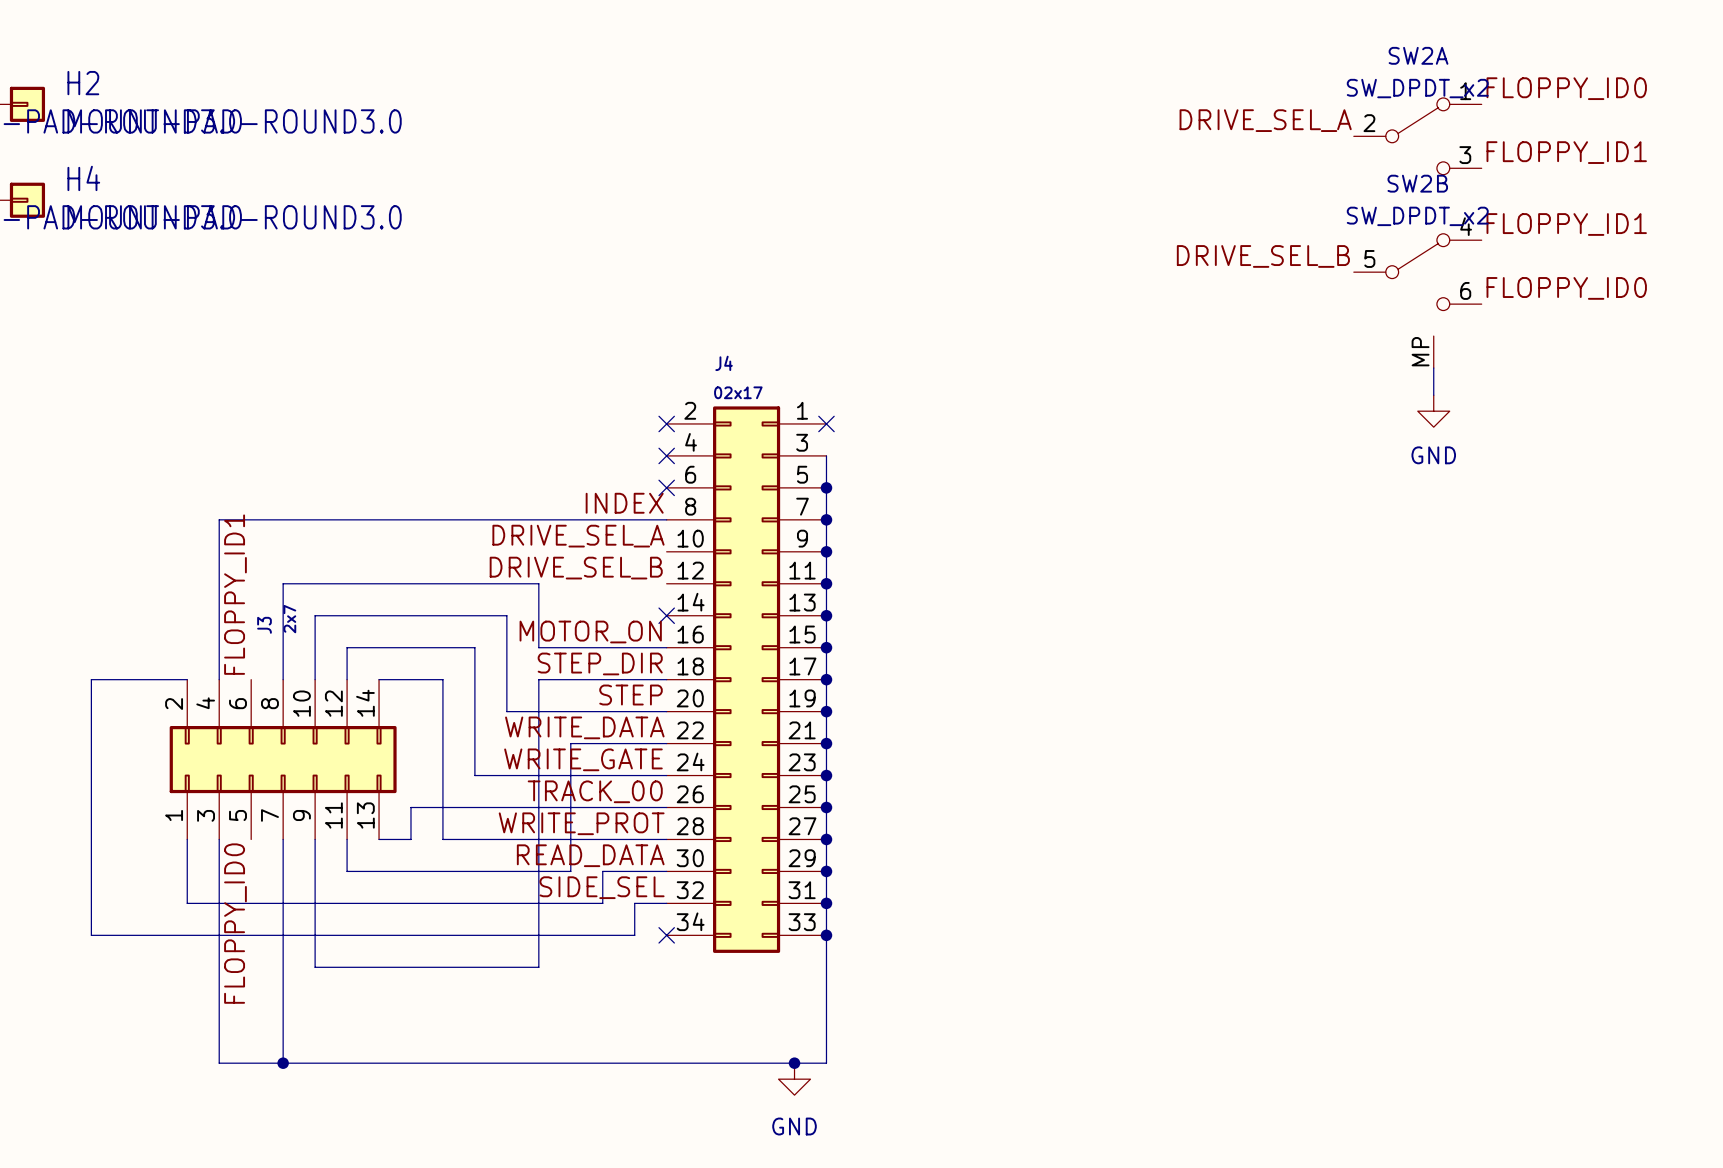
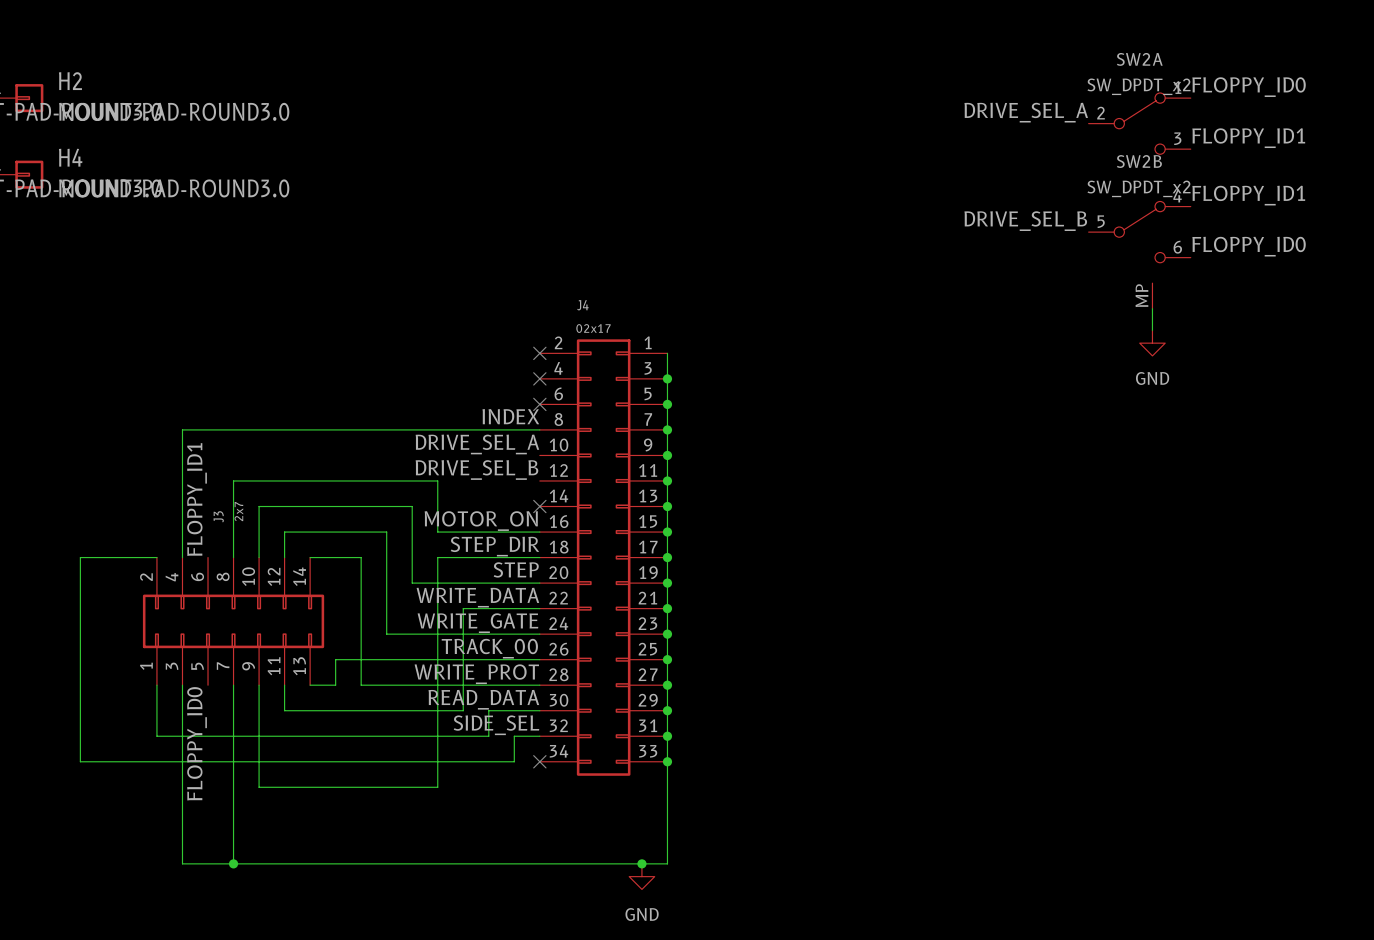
wire: none -> (667, 353) (667, 378)
no-connect mark: (826, 423) -> none
junction: none -> (667, 378)

